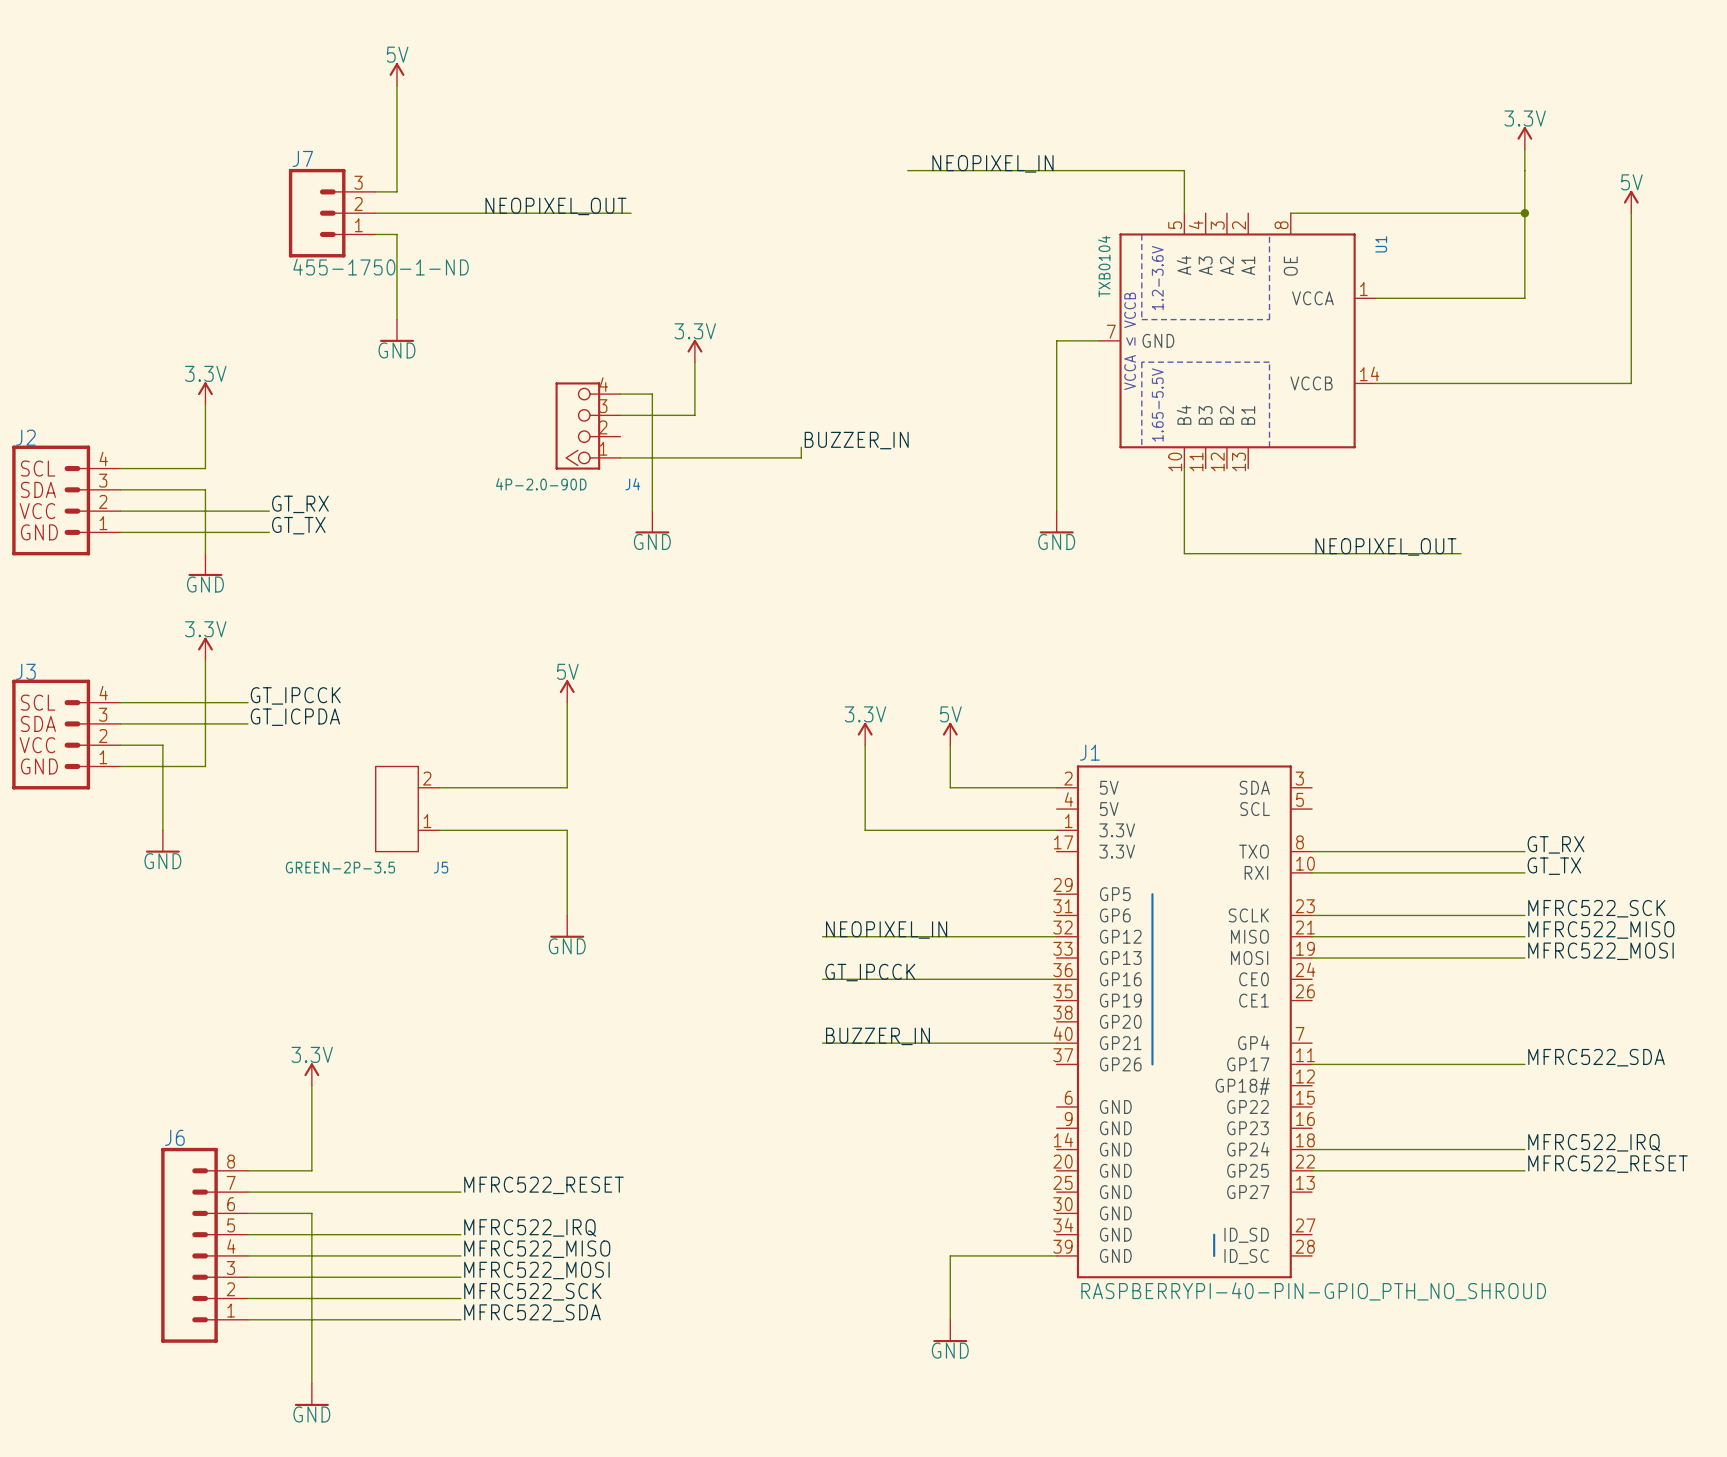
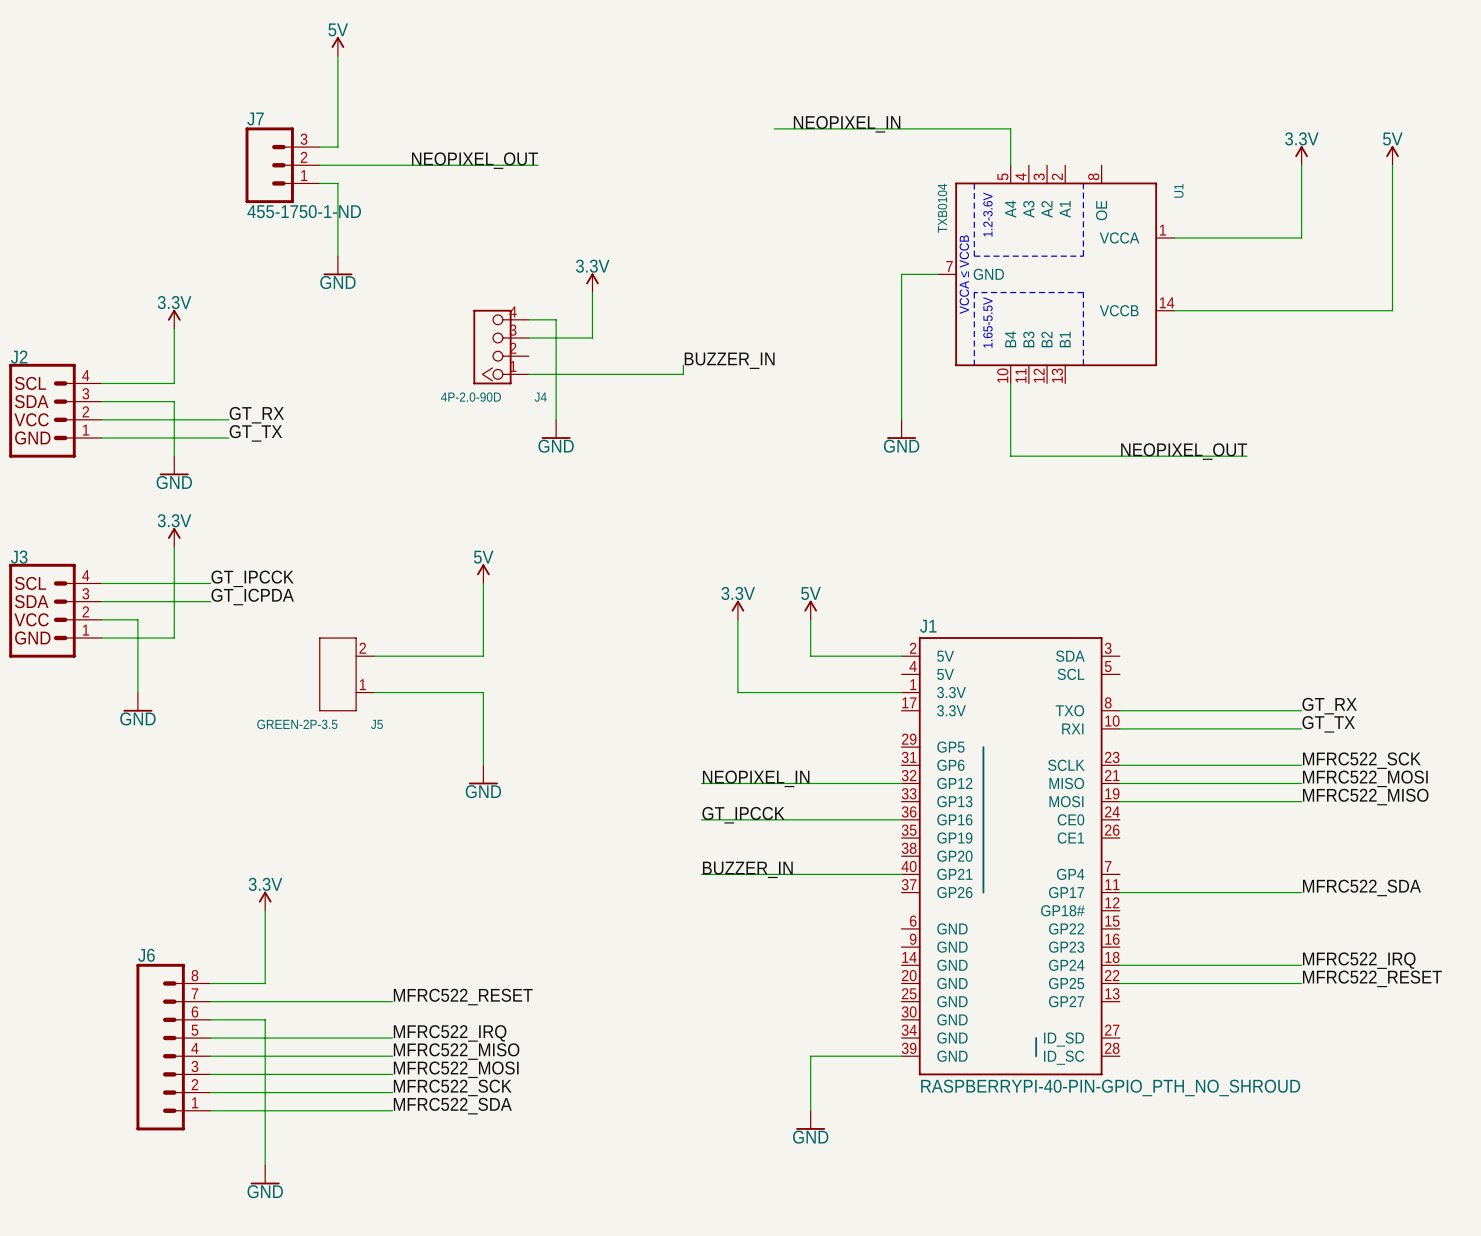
power symbol position: 3.3V (1524, 138) -> 3.3V (1301, 155)
wire: (1524, 149) (1524, 213) (1290, 213) -> none
junction: (1524, 213) -> none
label: MFRC522_MISO (1601, 930) -> MFRC522_MOSI (1365, 778)
label: MFRC522_MOSI (1600, 951) -> MFRC522_MISO (1365, 797)

